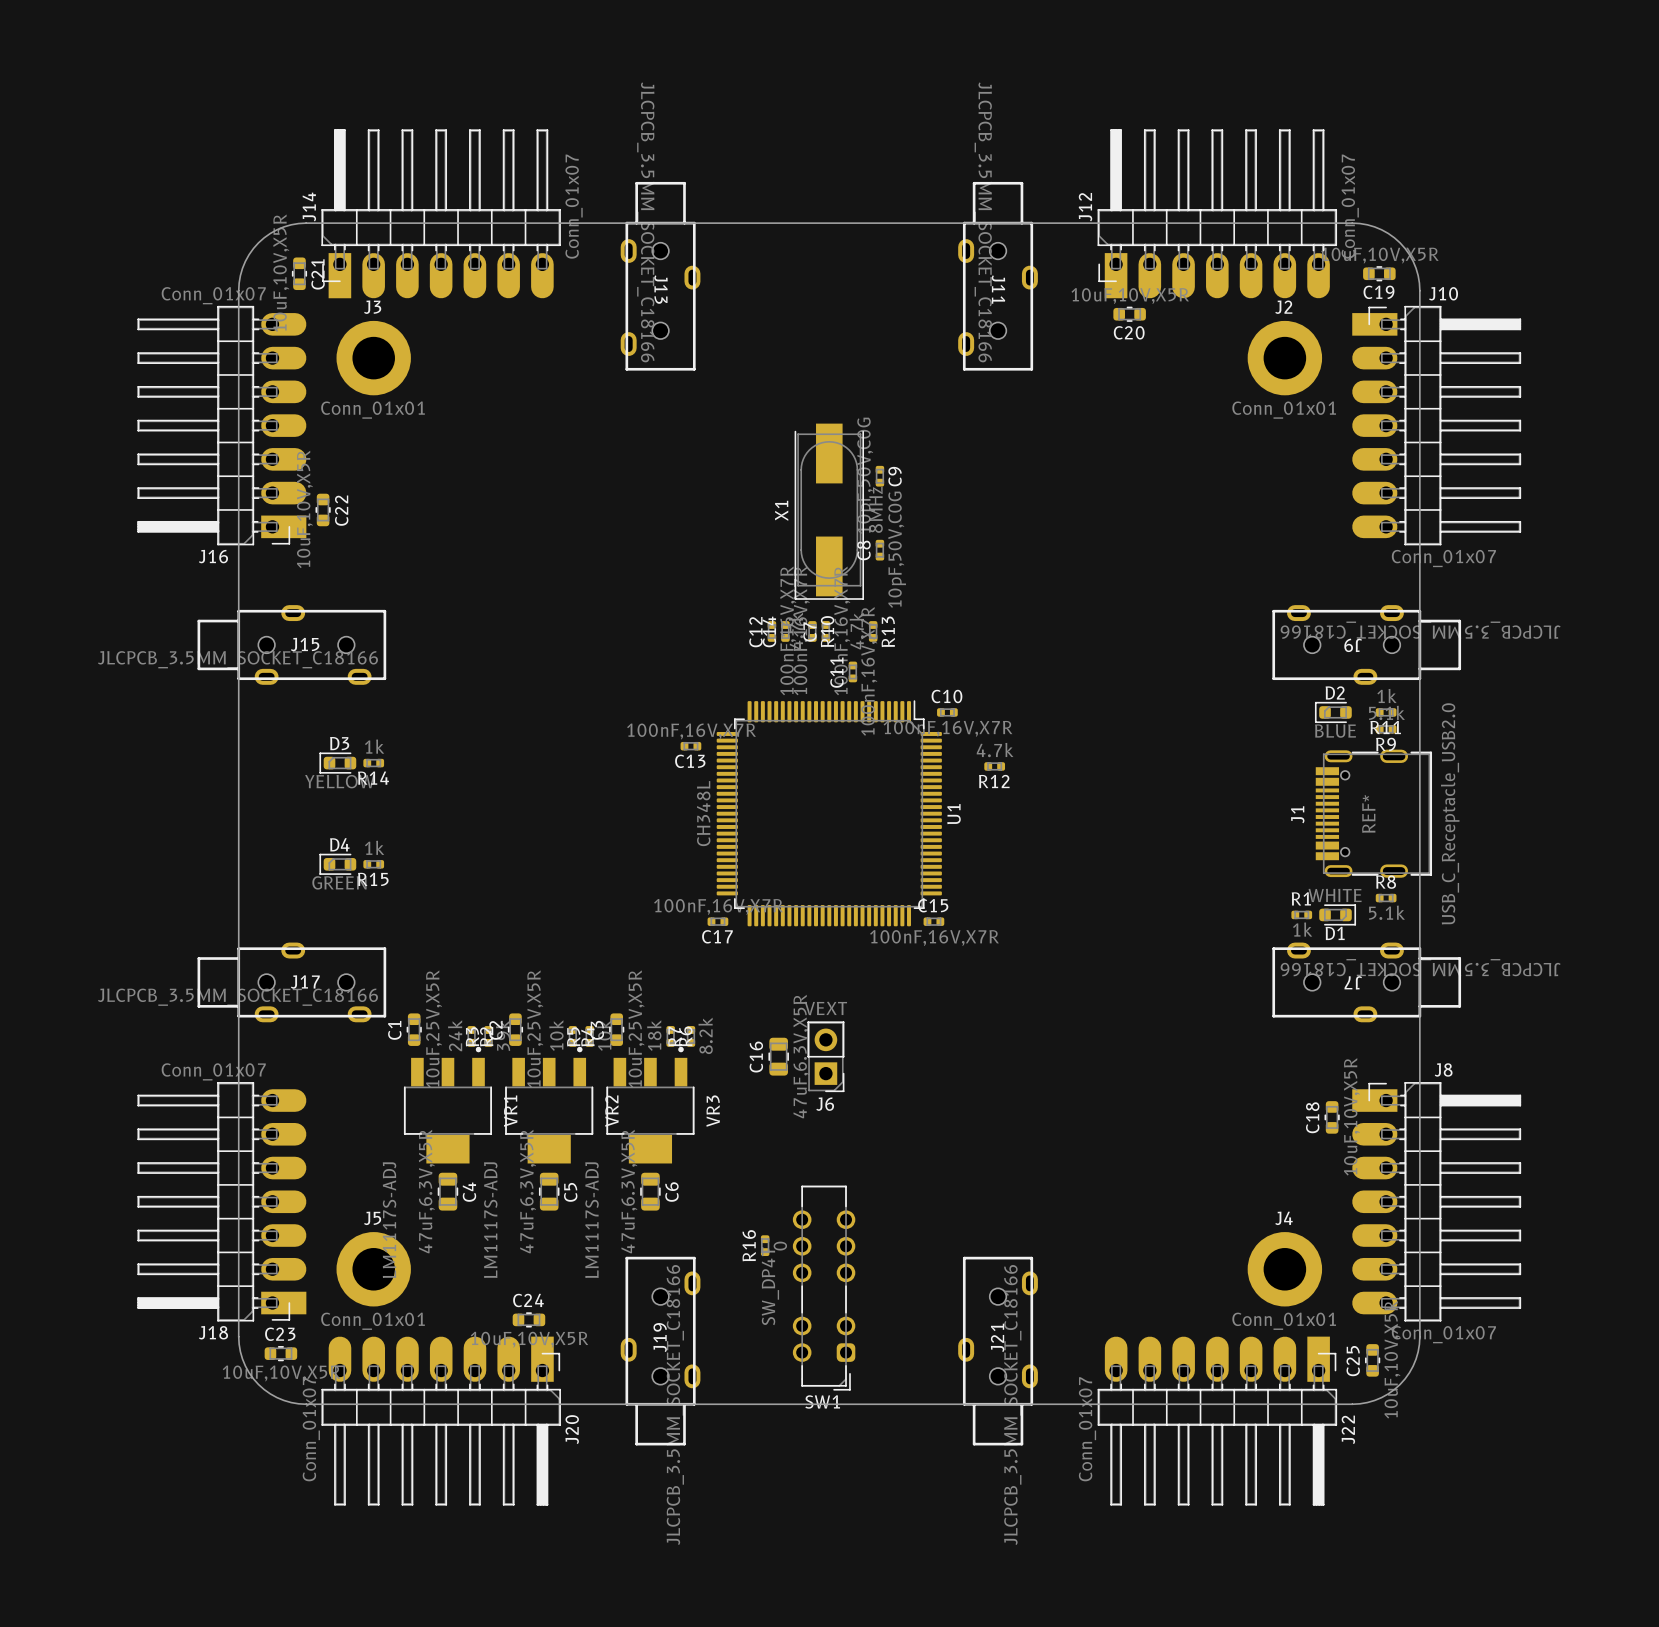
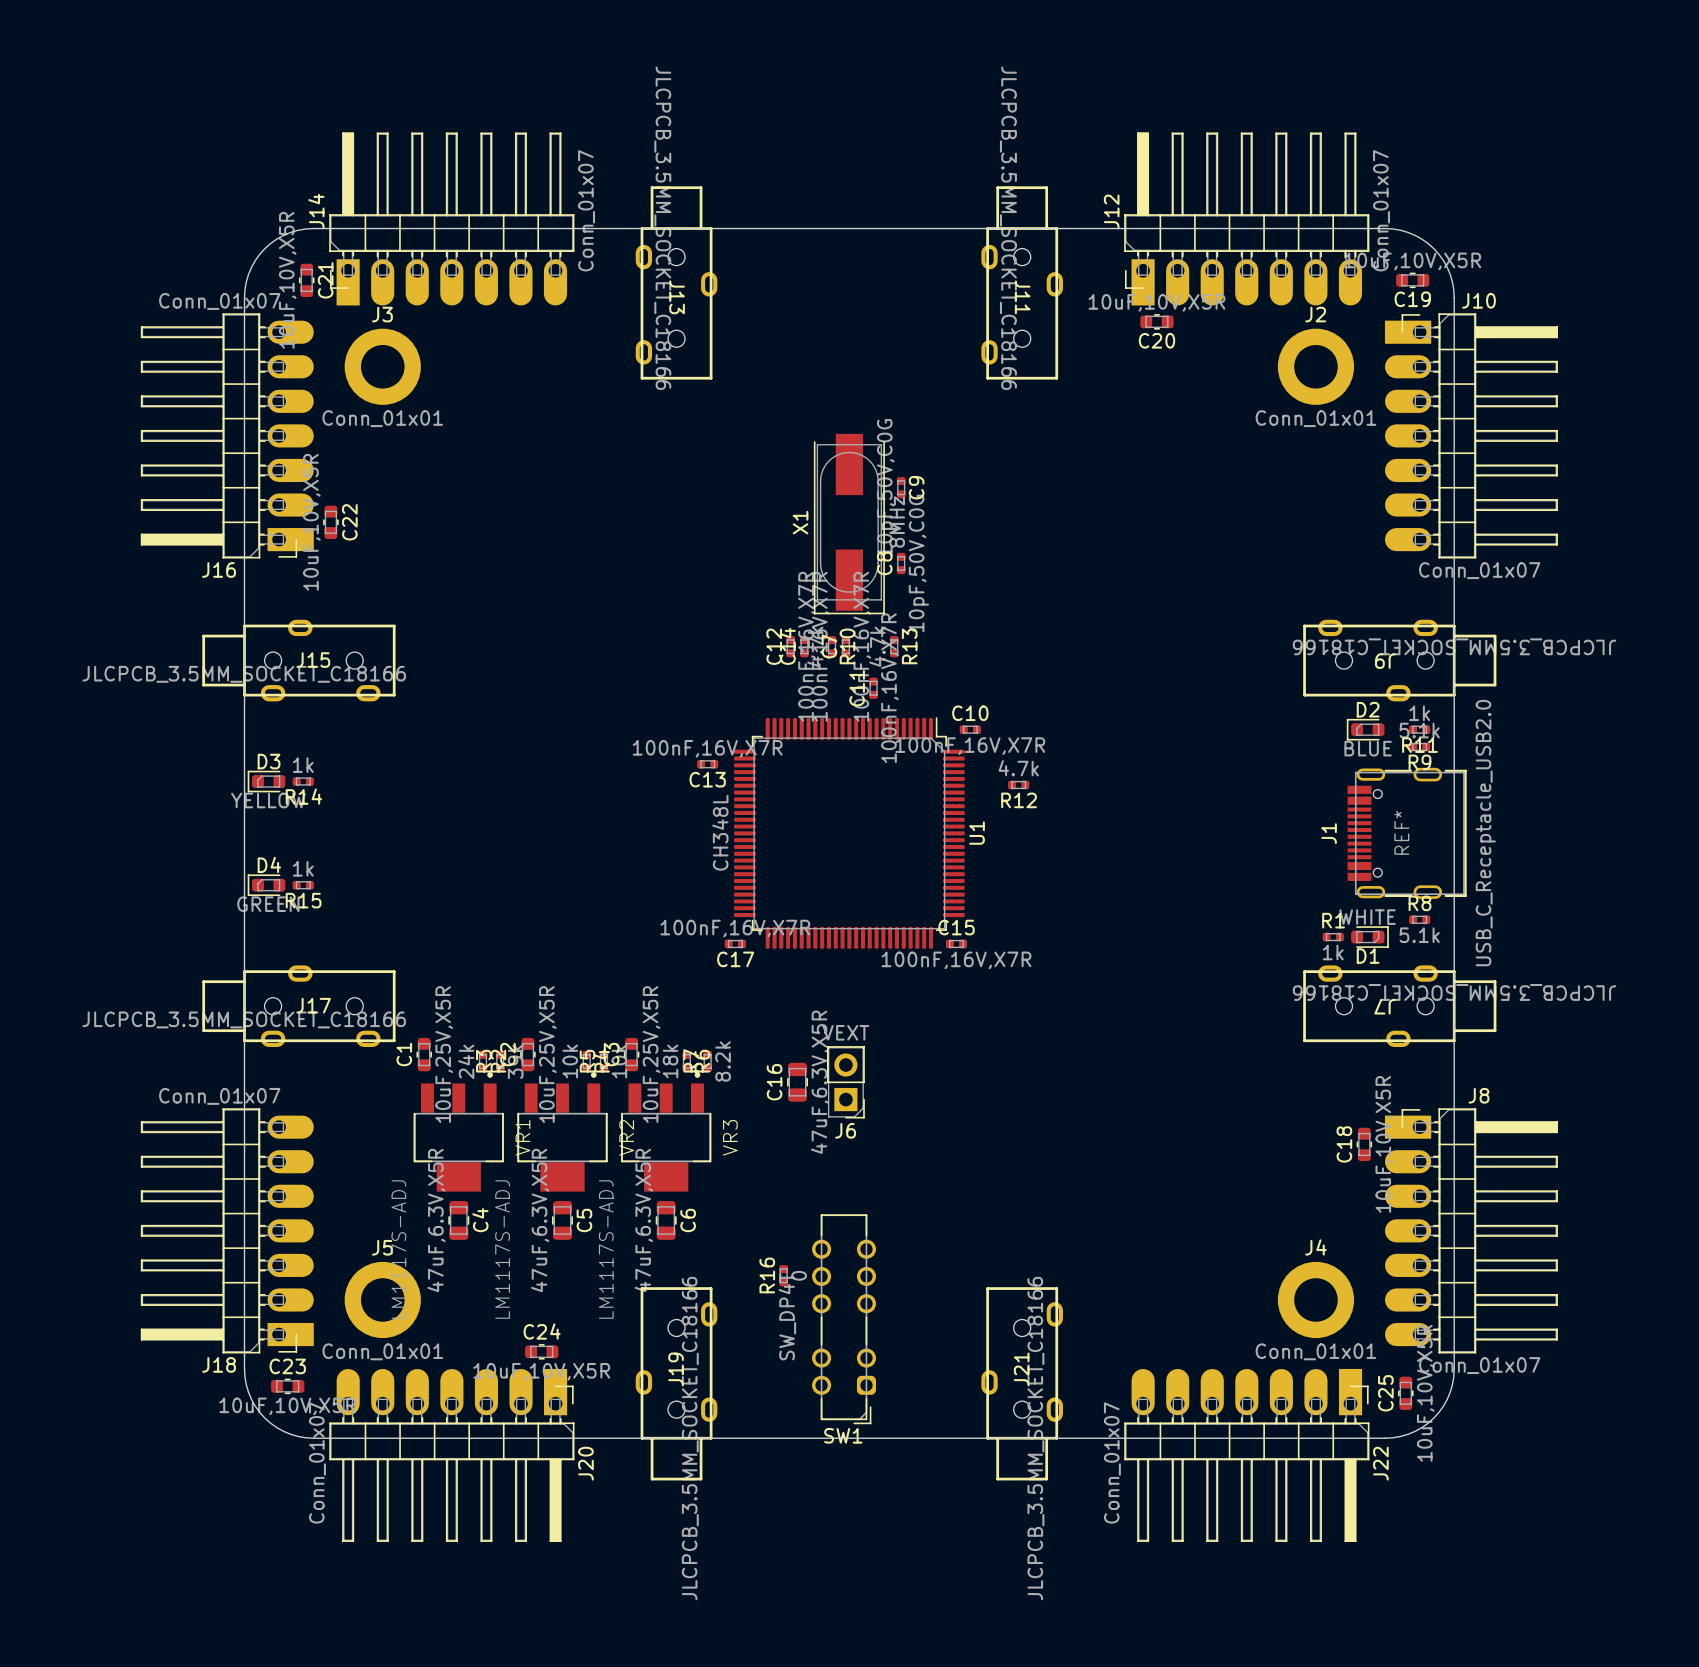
D3 position: (337, 763) -> (266, 781)
R14 position: (373, 763) -> (303, 781)
D4 position: (337, 864) -> (266, 885)
R15 position: (373, 864) -> (303, 885)

